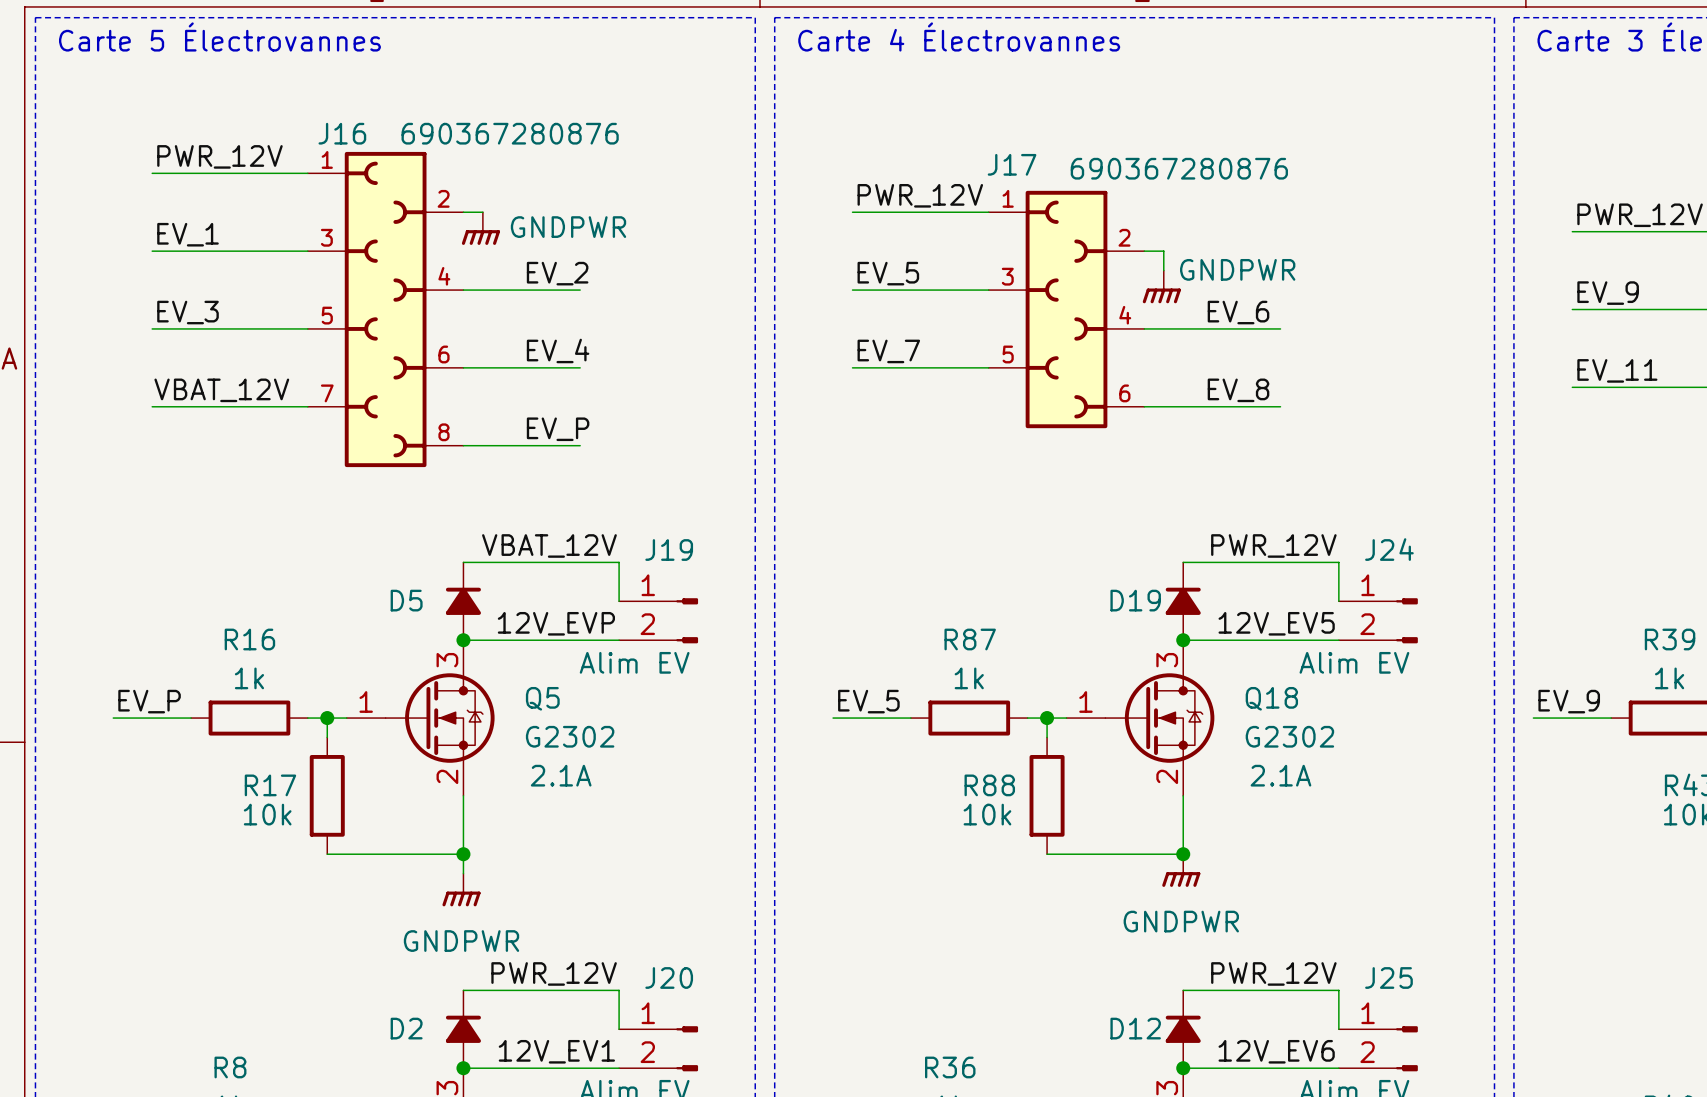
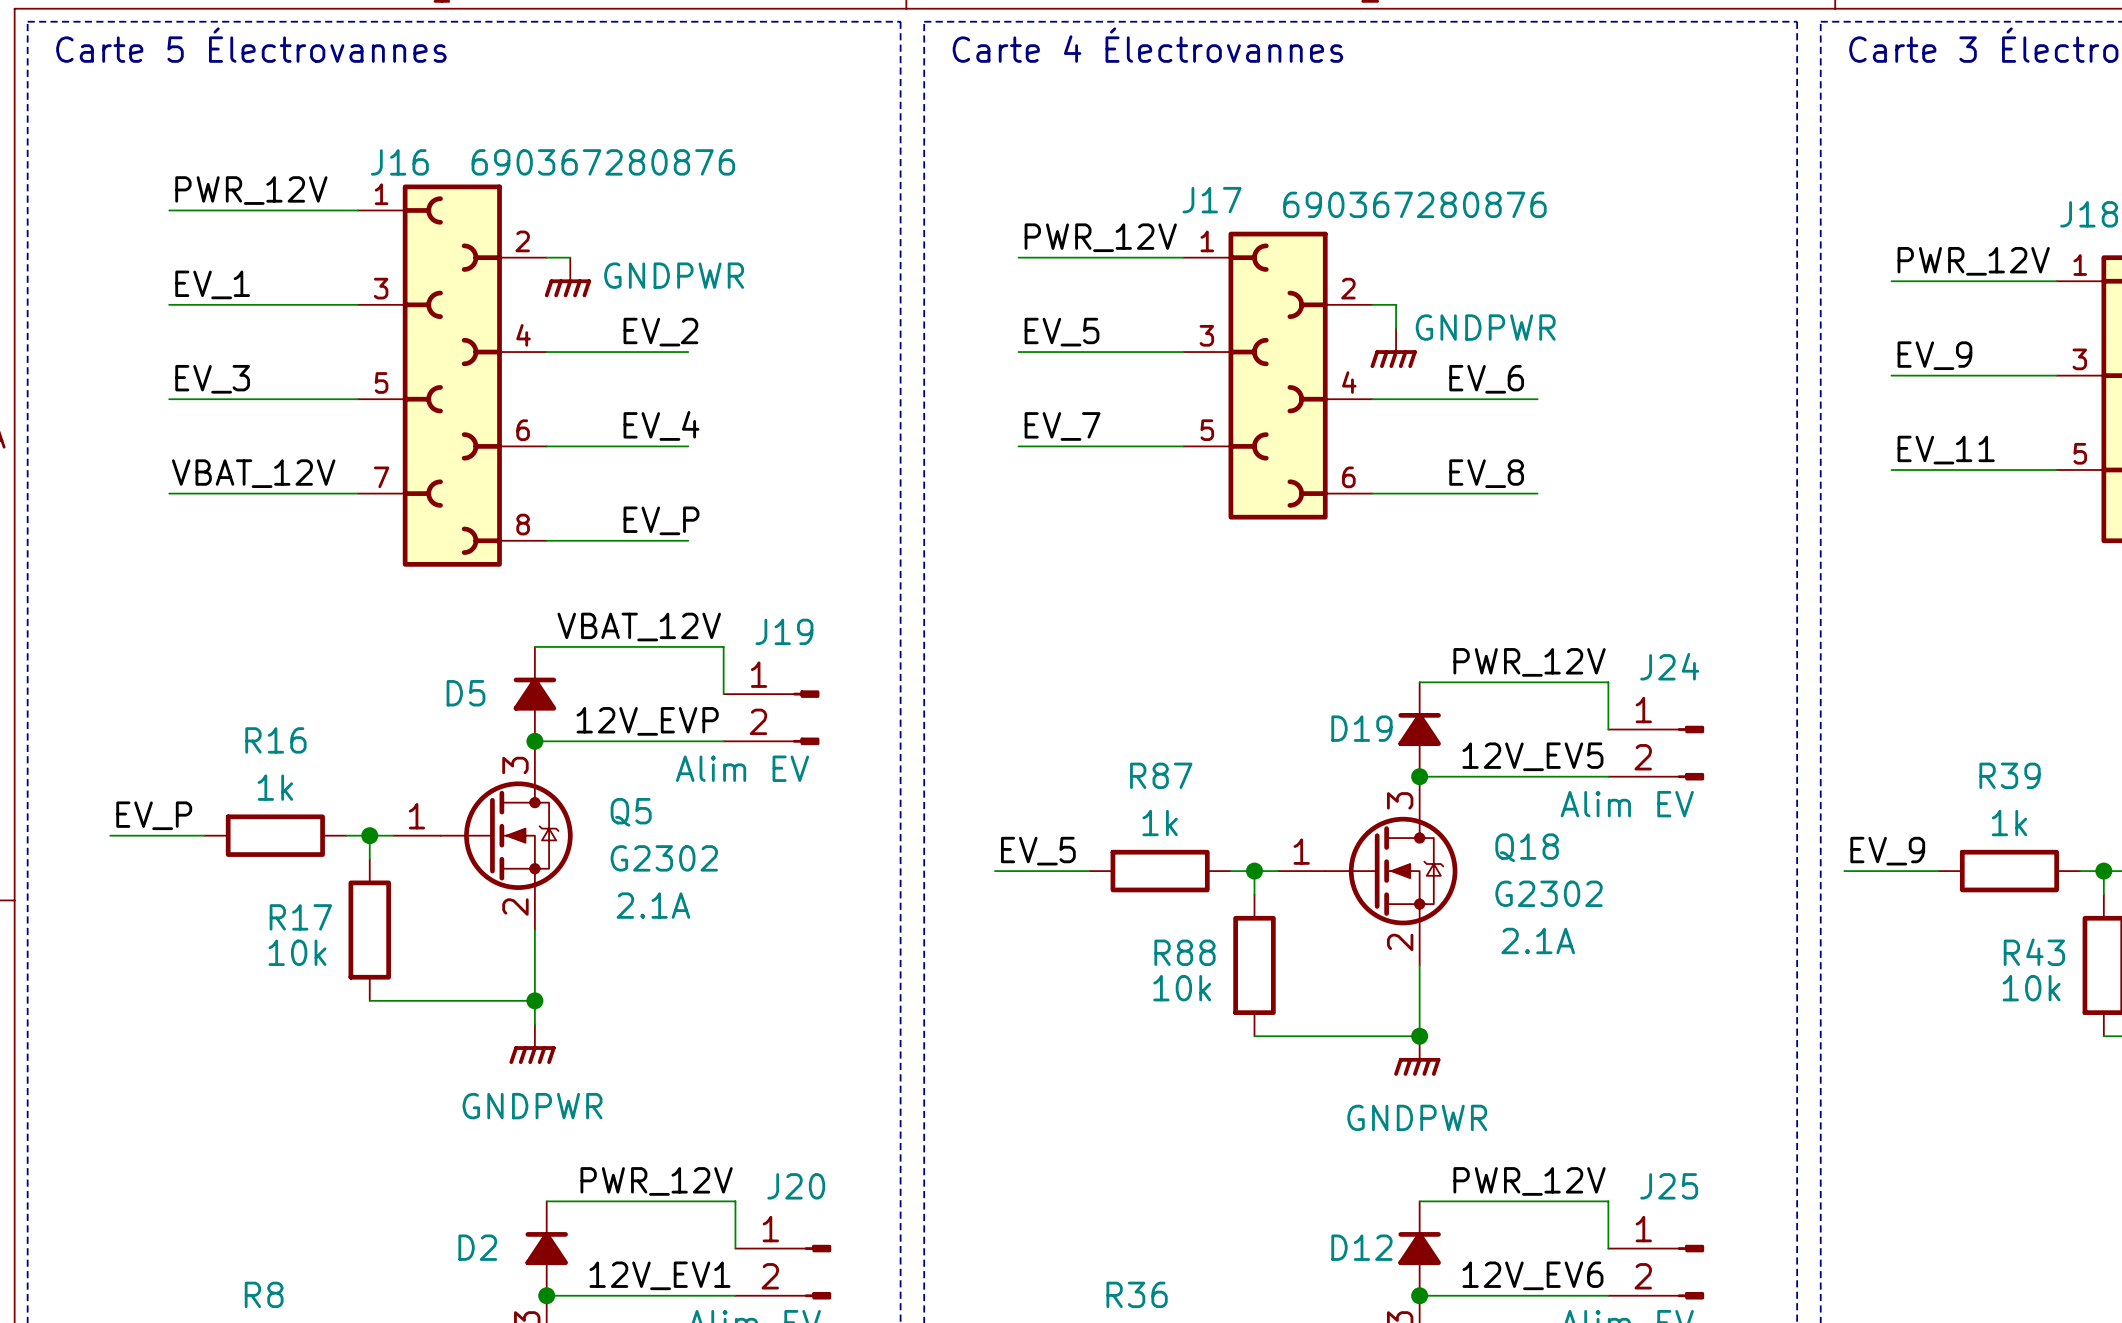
label position: VBAT_12V (549, 545) -> VBAT_12V (639, 627)
wire: (463, 562) (619, 562) (619, 601) -> (534, 646) (723, 646) (723, 694)
D5 position: (463, 601) -> (534, 694)
J19 position: (658, 620) -> (771, 717)
label position: 12V_EVP (556, 623) -> 12V_EVP (647, 721)
wire: (463, 640) (619, 640) -> (534, 741) (723, 741)
junction position: (463, 640) -> (534, 741)
label position: EV_P (149, 701) -> EV_P (154, 815)
wire: (113, 718) (191, 718) -> (110, 835) (204, 835)
R16 position: (249, 718) -> (275, 835)
wire: (307, 718) (346, 718) -> (346, 835) (393, 835)
wire: (327, 718) (327, 737) -> (369, 835) (369, 859)
junction position: (327, 718) -> (369, 835)
Q5 position: (420, 718) -> (483, 835)
R17 position: (327, 795) -> (369, 930)
wire: (463, 795) (463, 873) -> (534, 930) (534, 1024)
wire: (327, 854) (463, 854) -> (369, 1000) (534, 1000)
junction position: (463, 854) -> (534, 1000)
power symbol position: GNDPWR (461, 890) -> GNDPWR (532, 1044)

